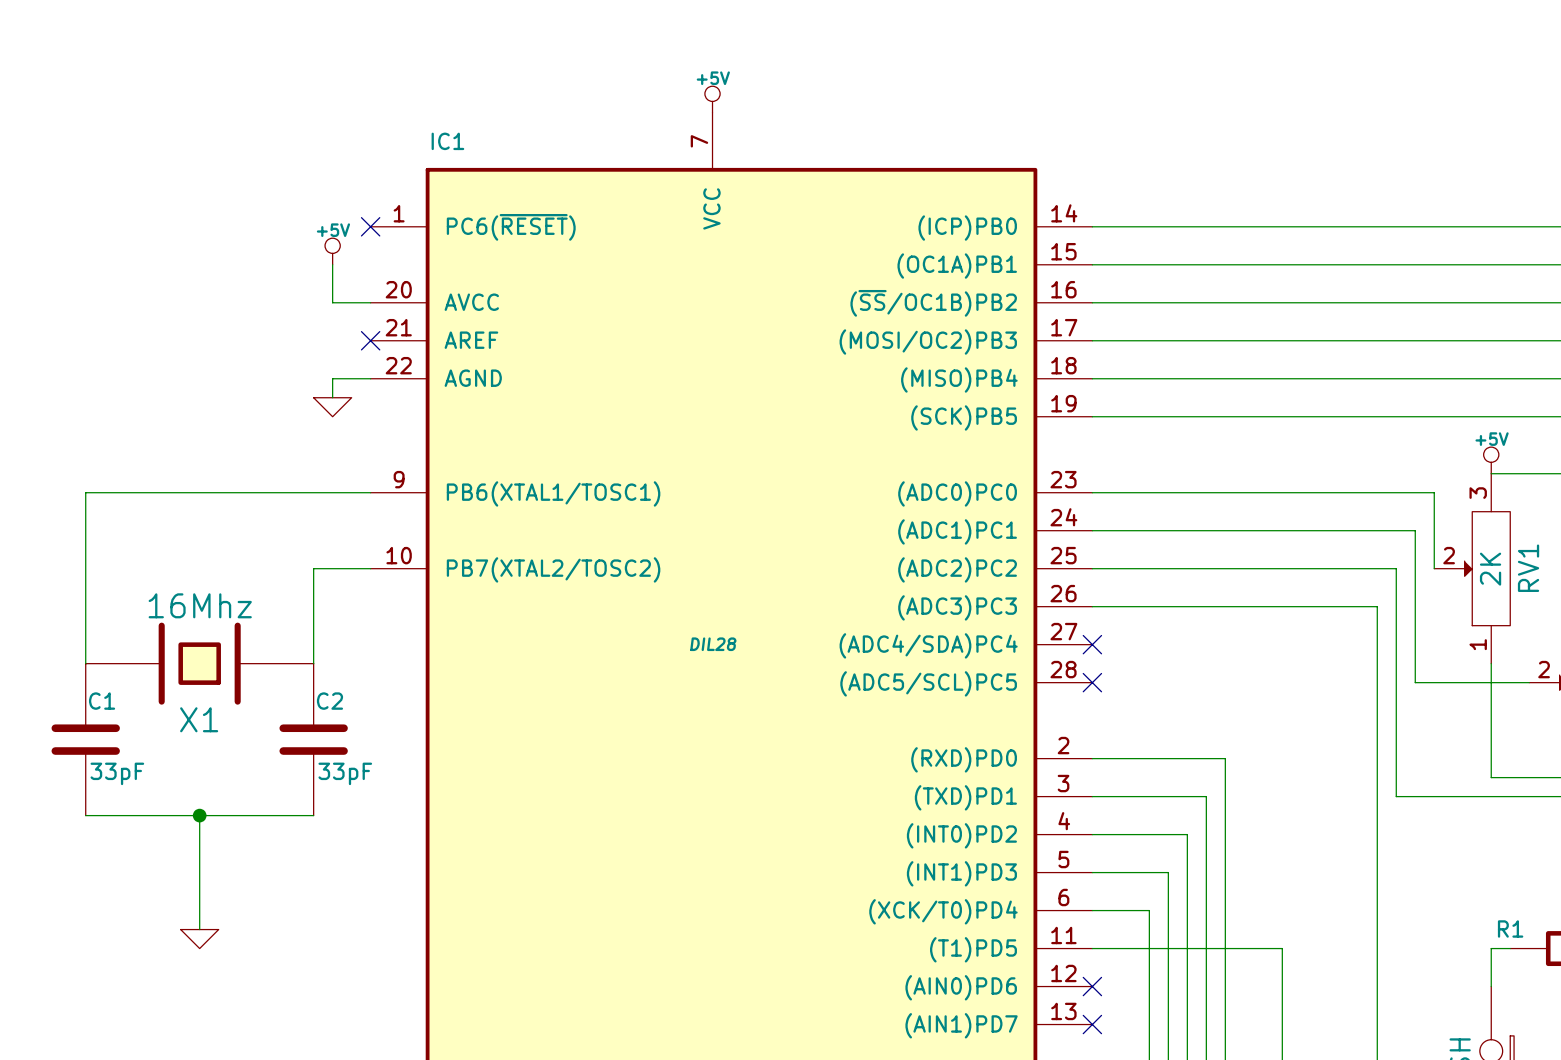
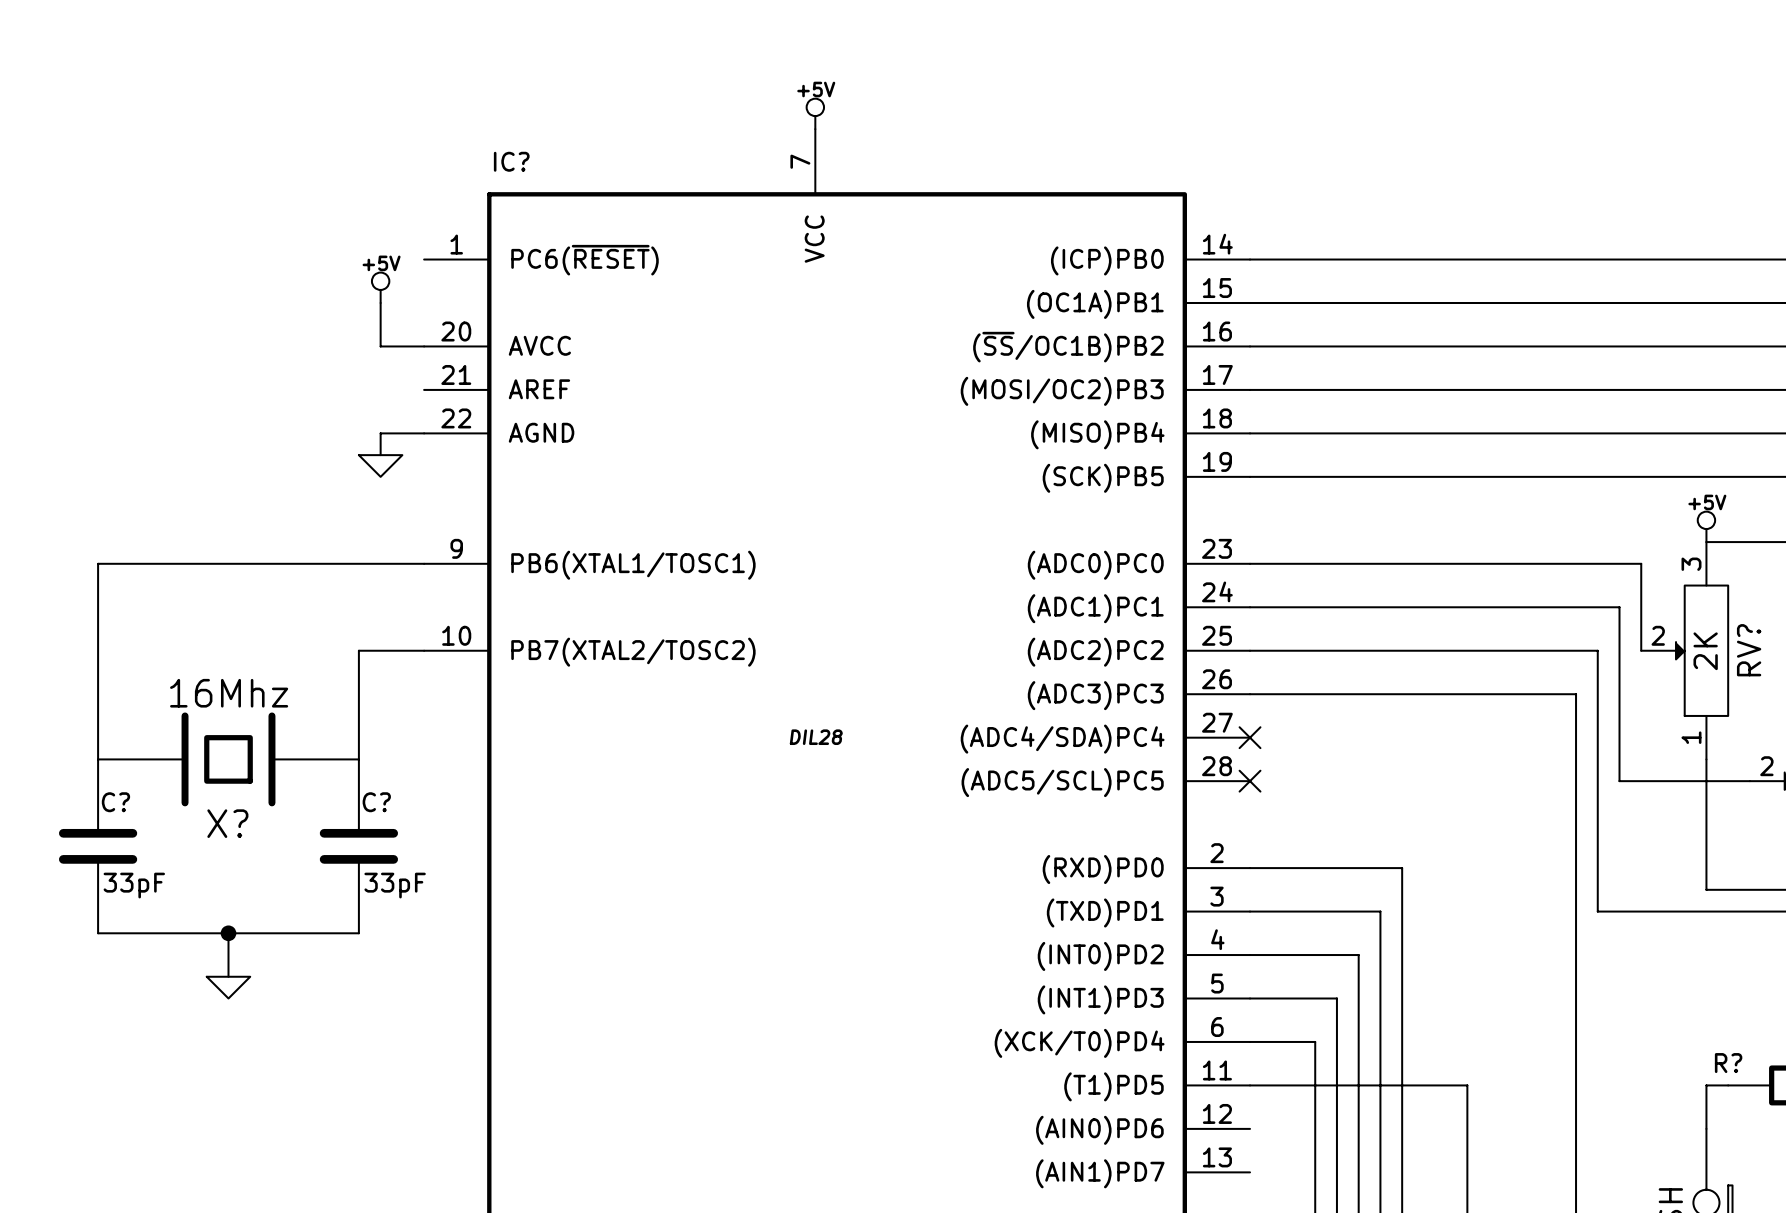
IC1 name: IC1 (447, 141) -> IC? (511, 161)
no-connect mark: (370, 226) -> none
no-connect mark: (370, 340) -> none
RV1 name: RV1 (1528, 568) -> RV? (1749, 650)
C1 name: C1 (102, 701) -> C? (115, 802)
C2 name: C2 (329, 701) -> C? (376, 802)
X1 name: X1 (199, 719) -> X? (227, 823)
wire: (199, 853) (199, 929) -> none
R1 name: R1 (1510, 928) -> R? (1728, 1063)
power symbol position: (199, 939) -> (228, 987)
no-connect mark: (1092, 986) -> none
no-connect mark: (1092, 1024) -> none

